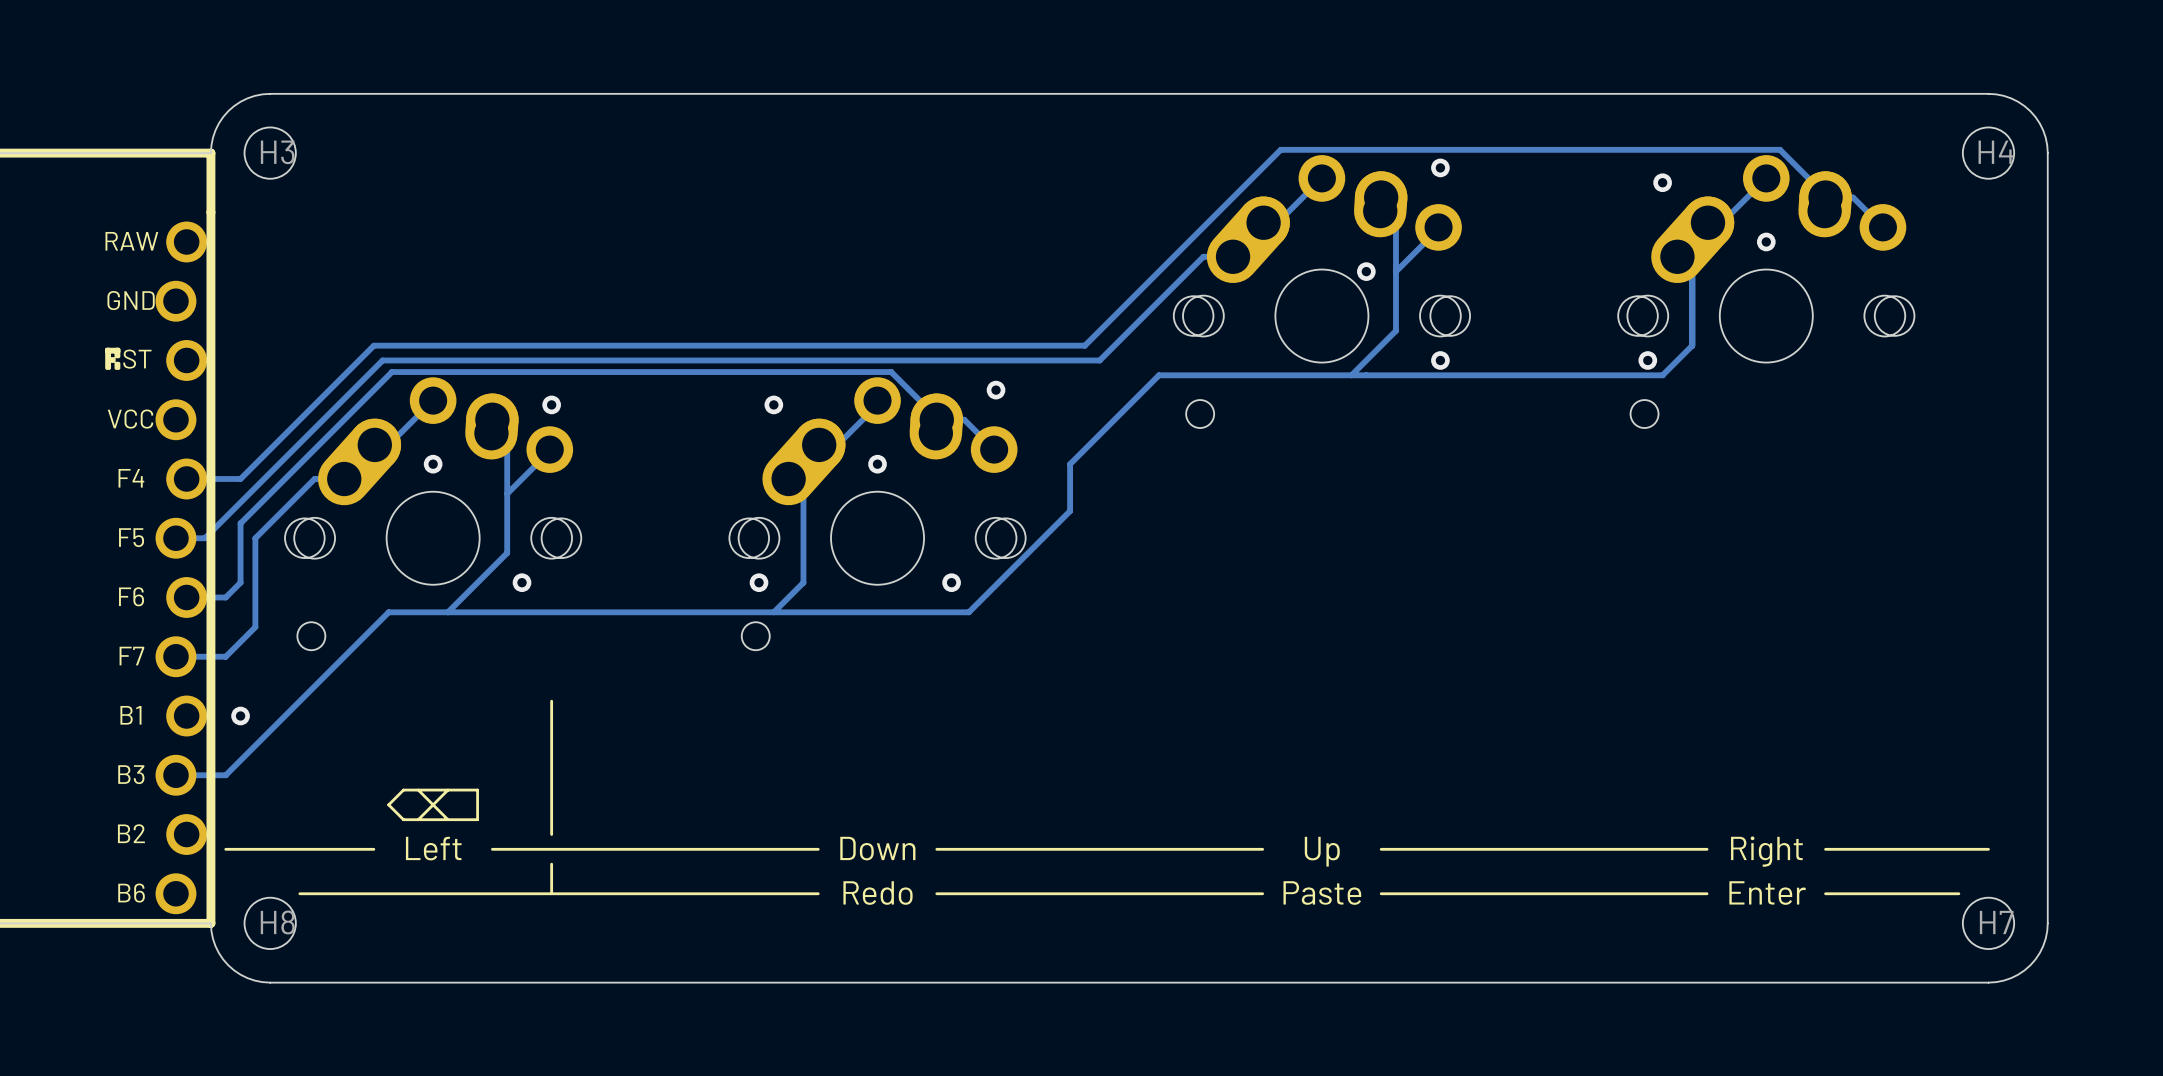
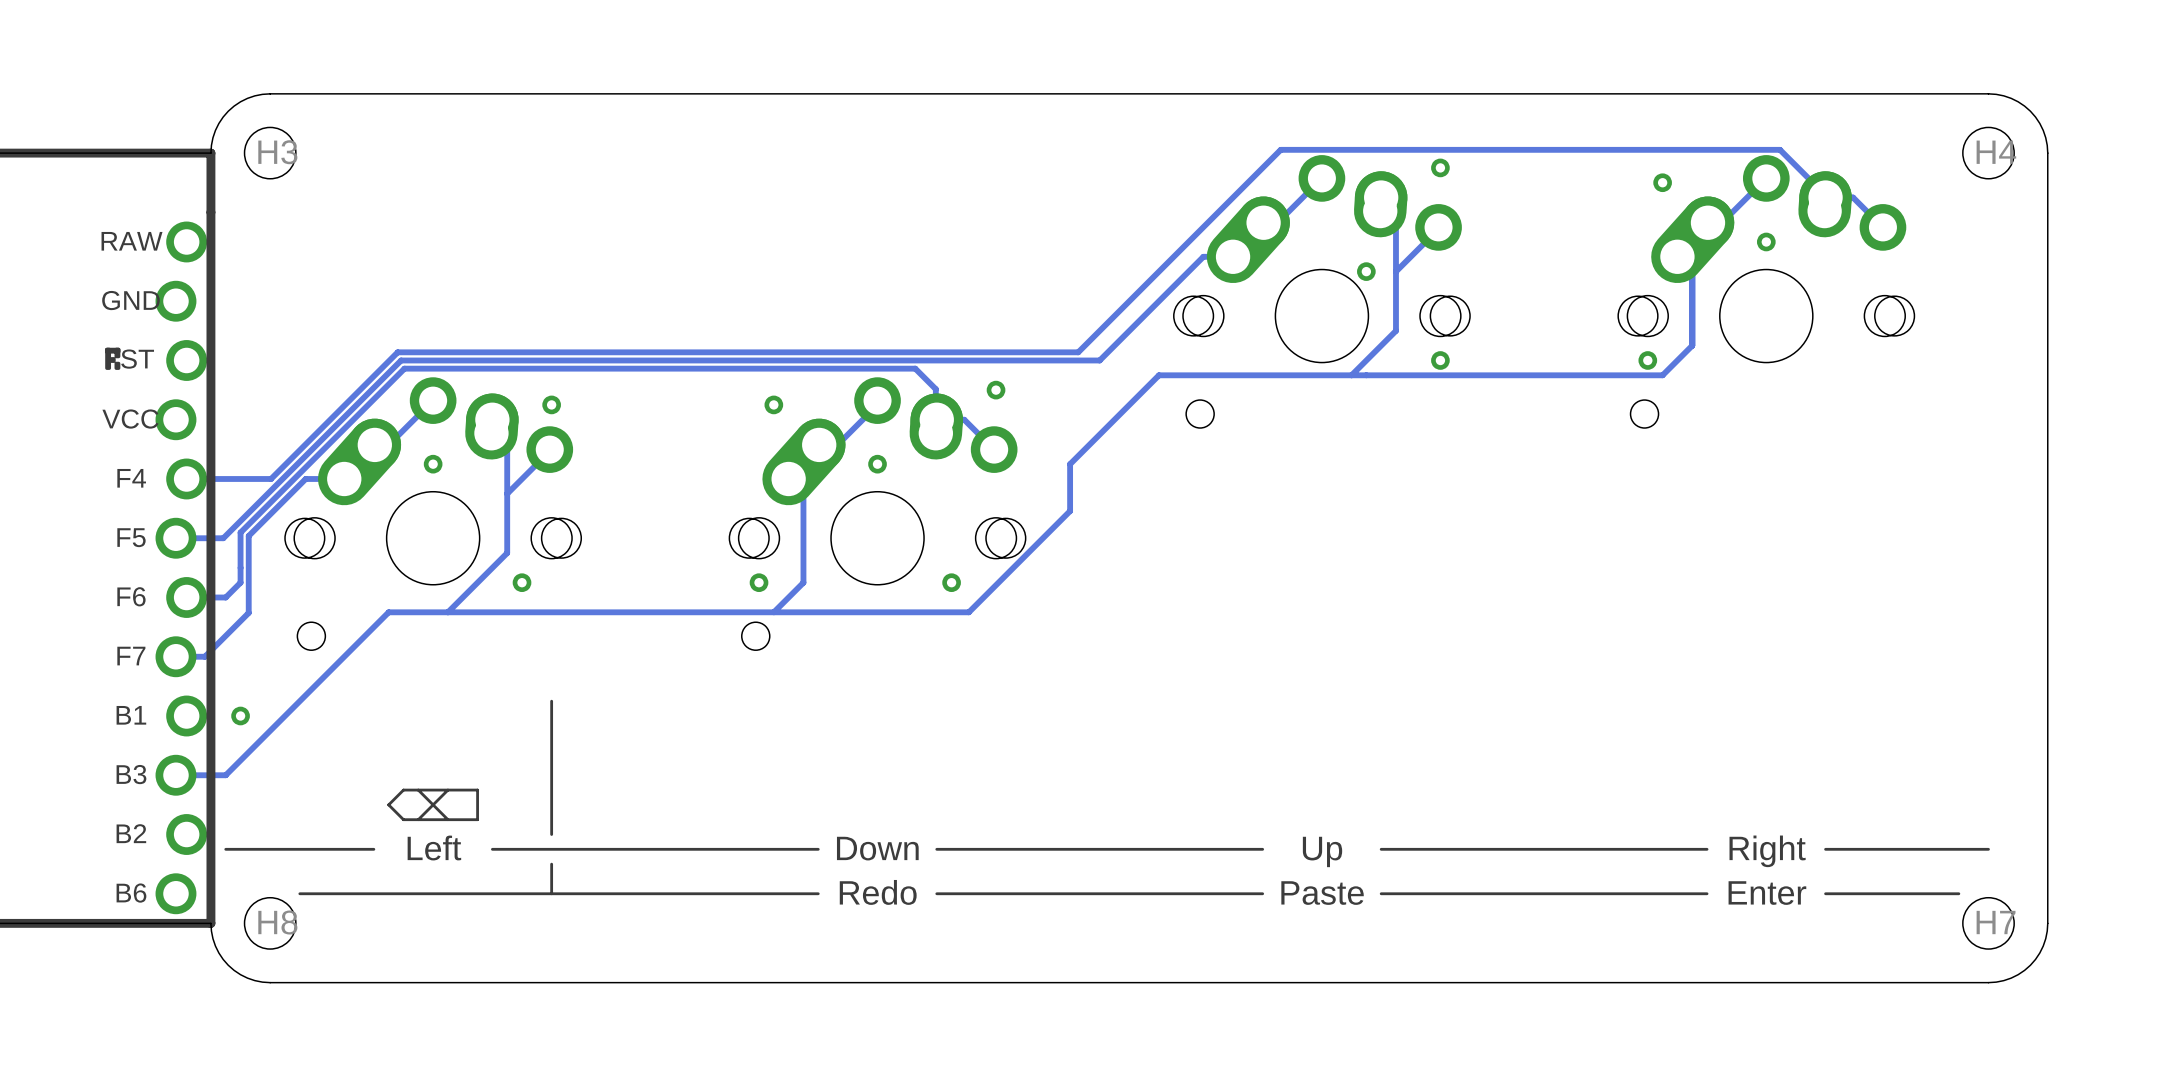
bottom track: (1084, 345) (373, 345) (240, 478) -> (1084, 345) (1078, 352) (397, 352) (271, 478) (240, 478)
bottom track: (401, 360) (382, 360) (204, 538) -> (401, 360) (223, 538) (204, 538)
bottom track: (935, 416) (891, 372) (391, 372) (240, 523) (240, 532) -> (935, 433) (935, 389) (915, 368) (404, 368) (240, 532)
bottom track: (314, 478) (255, 538) (255, 627) (225, 656) (204, 656) -> (314, 478) (305, 478) (248, 535) (248, 612) (204, 656)

